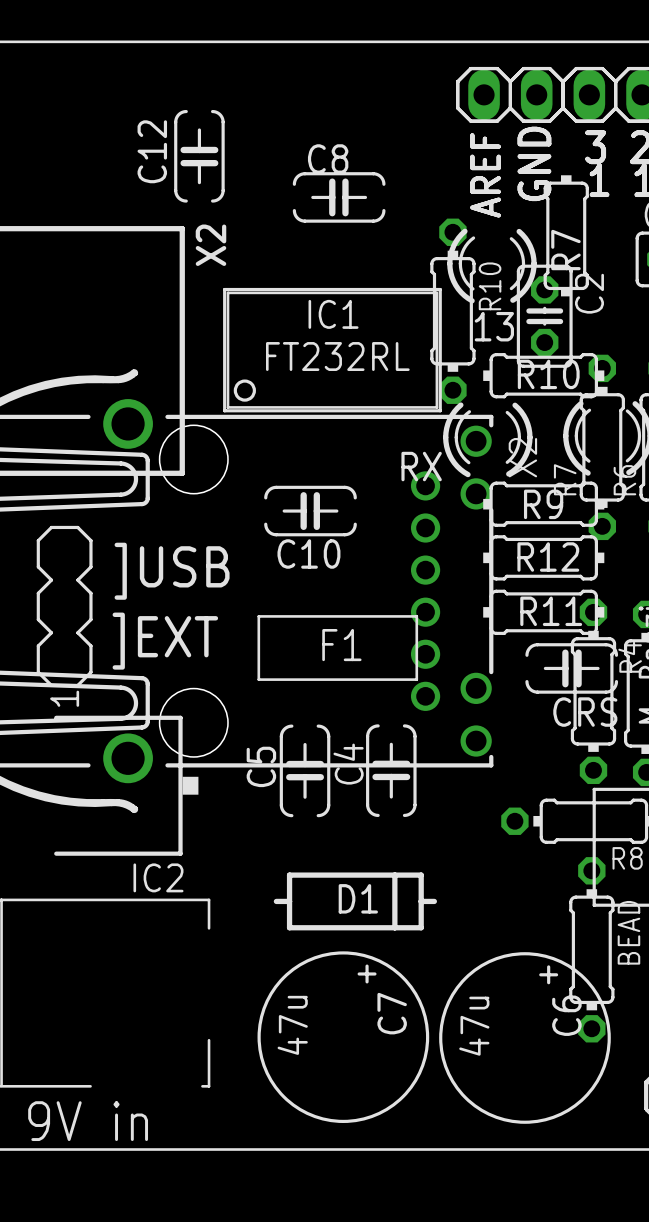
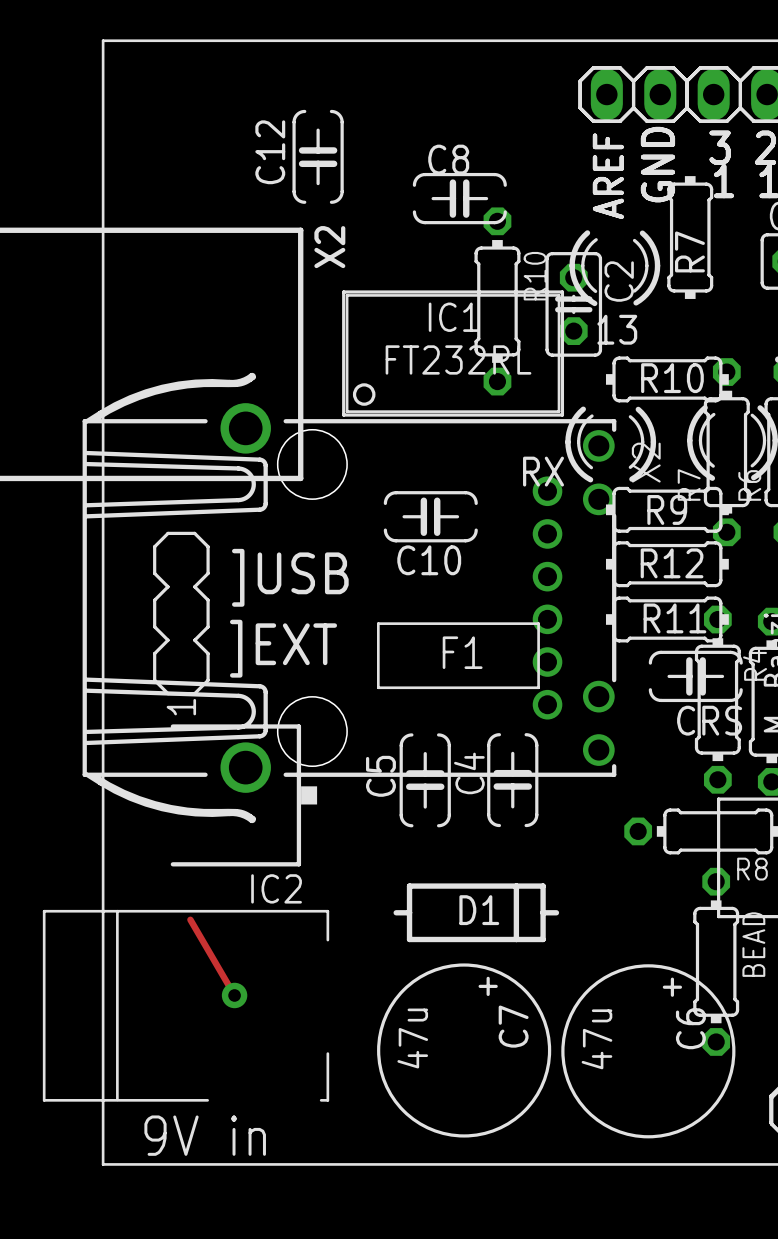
R10 position: (452, 311) -> (497, 301)
C2 position: (544, 316) -> (573, 304)
track: none -> (190, 919) (234, 995)
via: none -> (234, 995)

